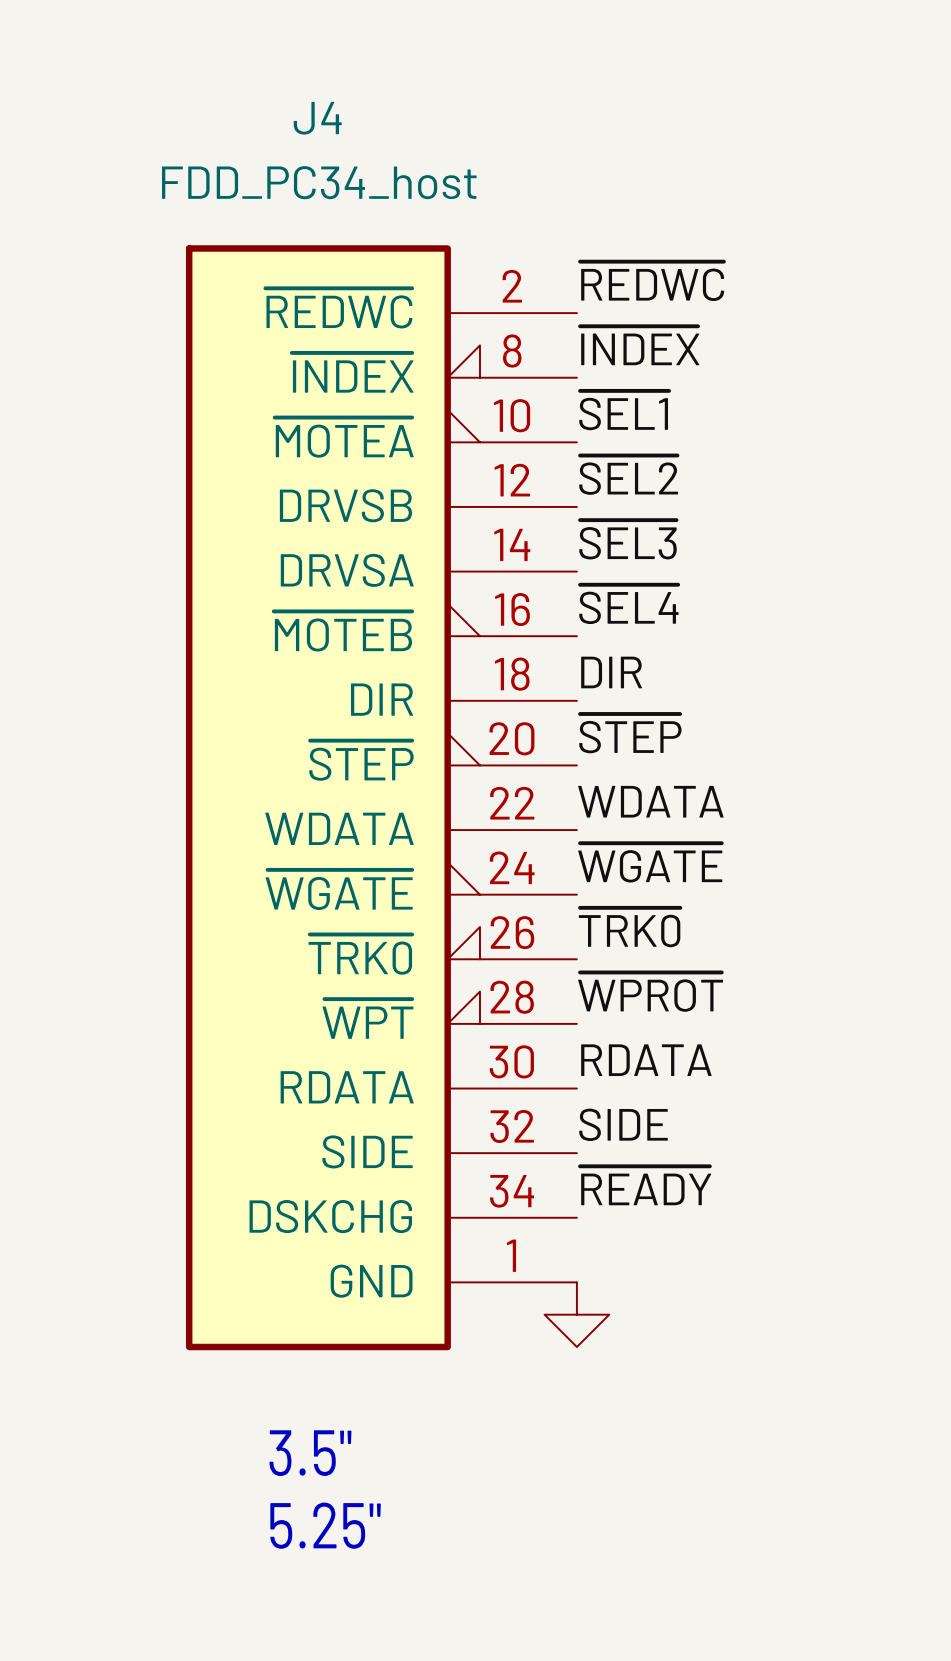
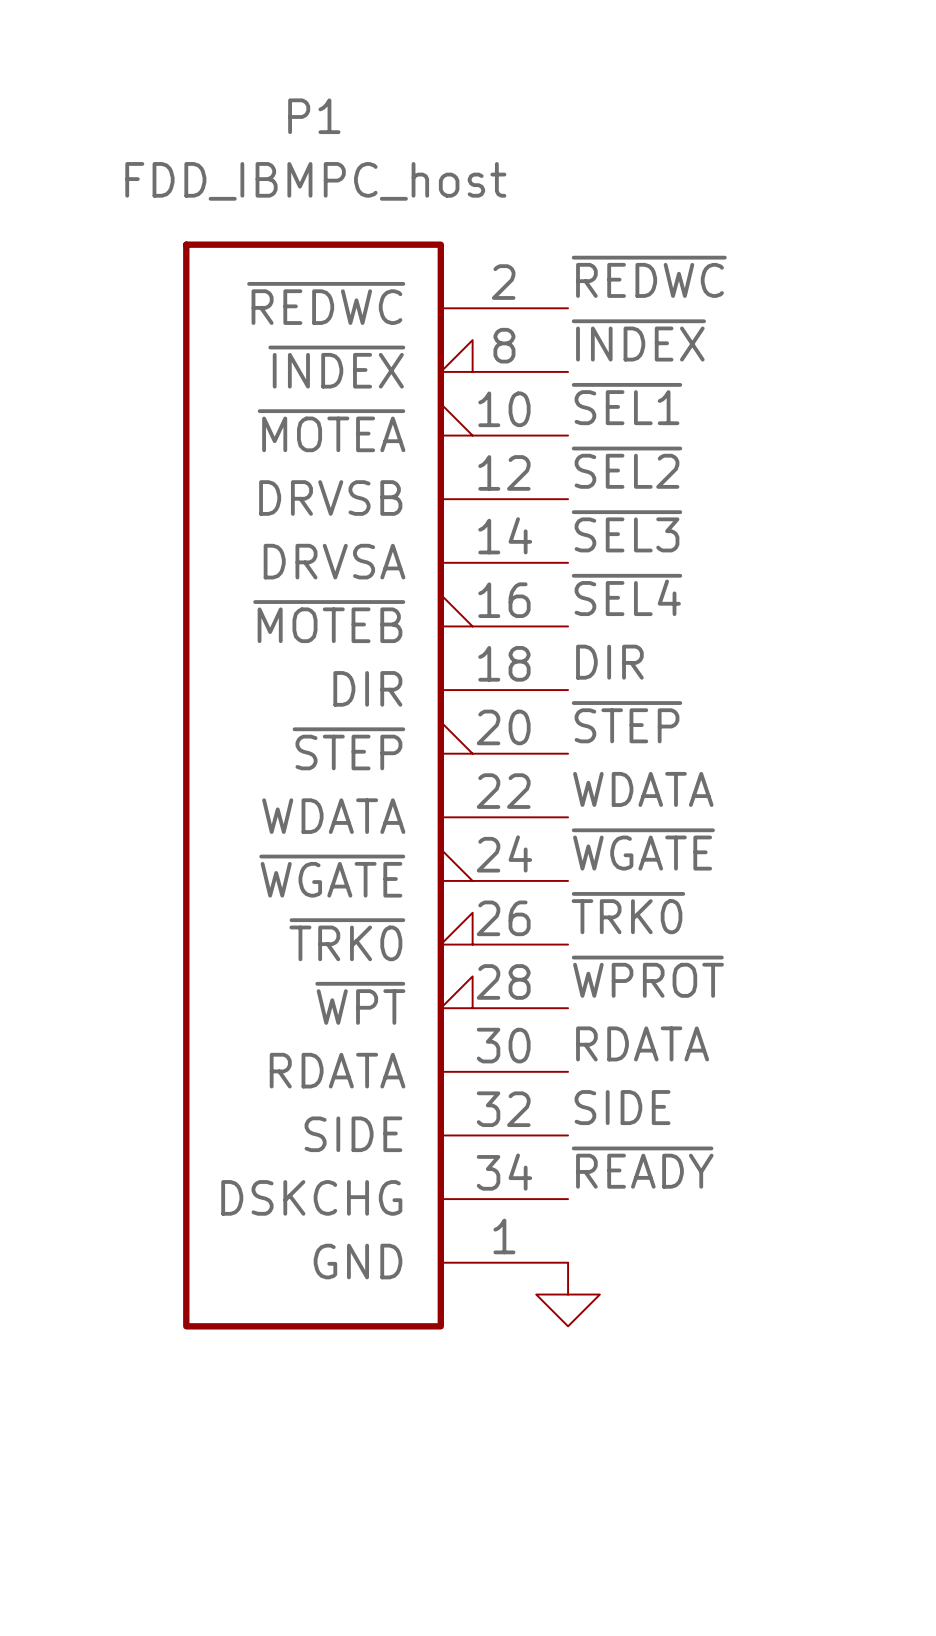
J4 name: J4 (317, 118) -> P1 (314, 116)
J4 value: FDD_PC34_host (319, 182) -> FDD_IBMPC_host (315, 181)
text: 3.5" (310, 1453) -> none
text: 5.25" (325, 1525) -> none

